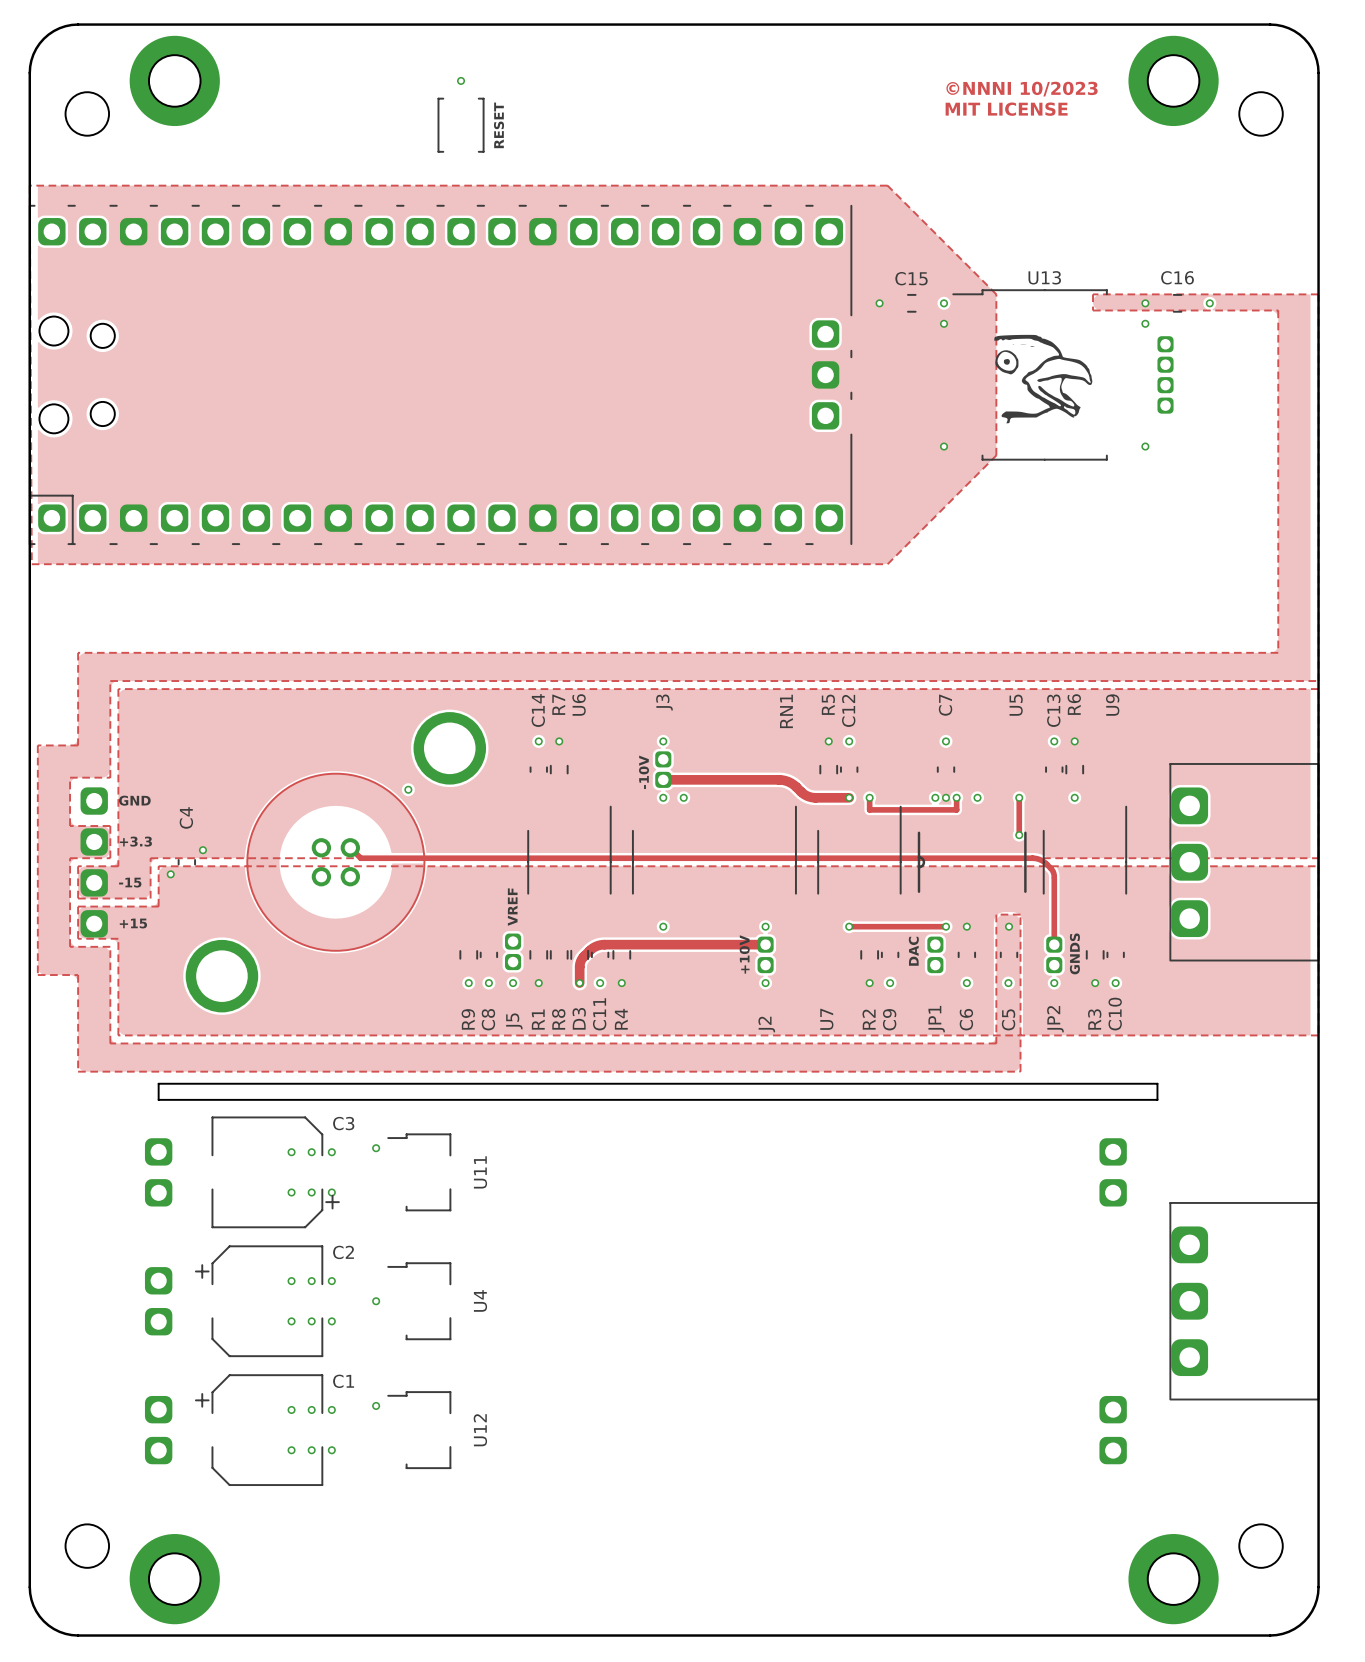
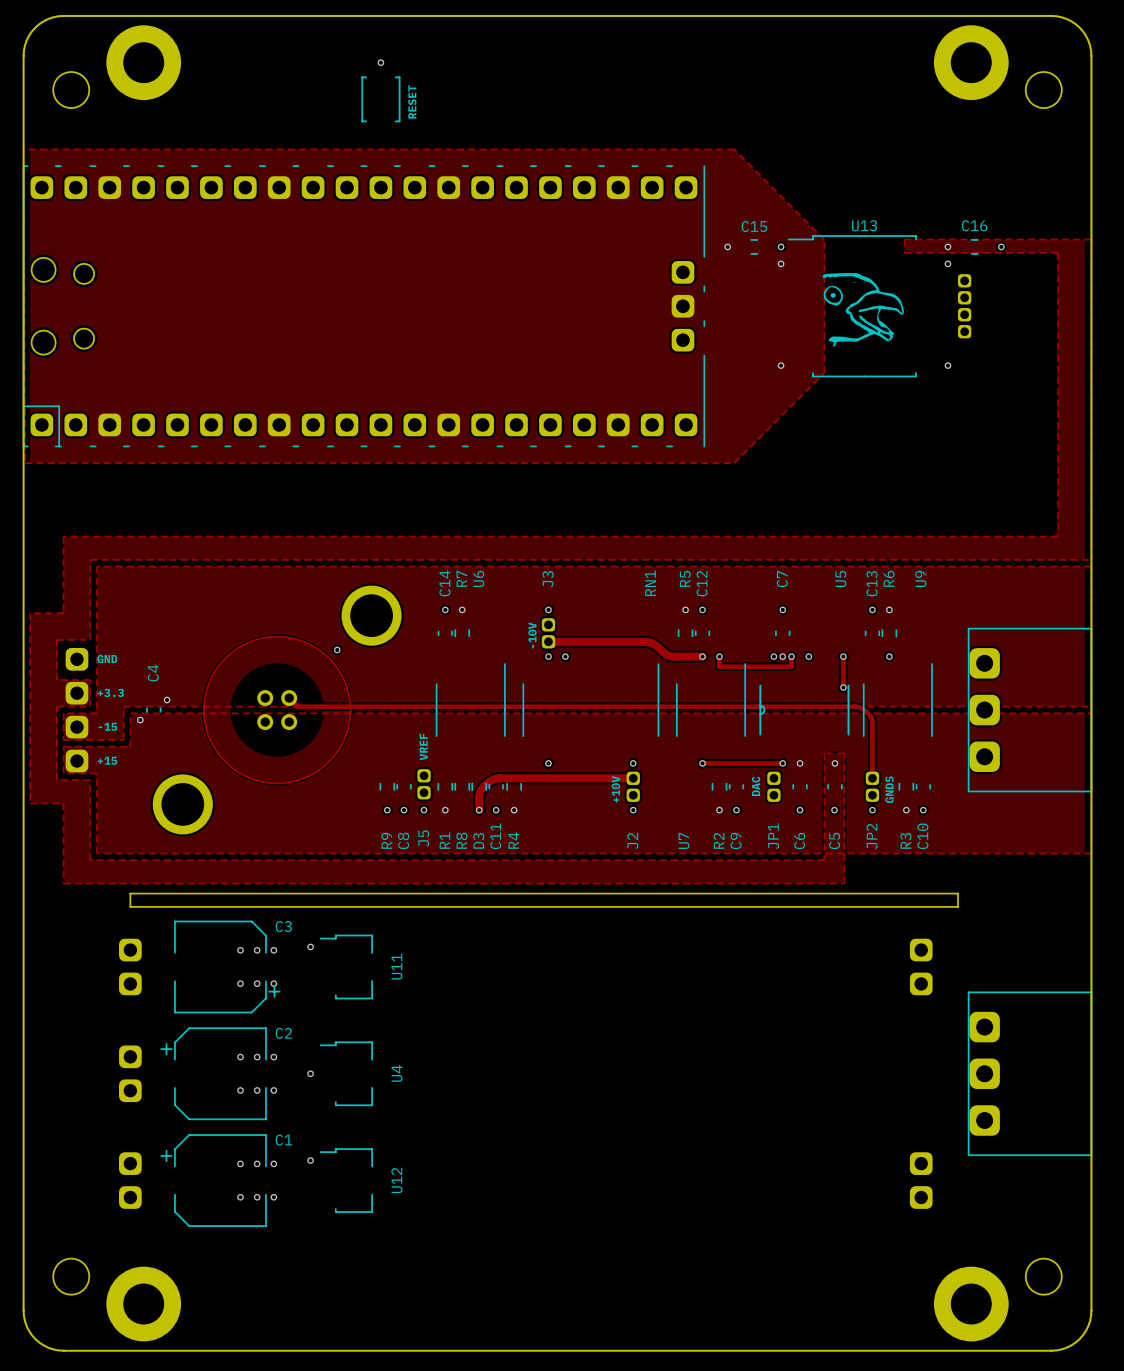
text: ©NNNI 10/2023 (1022, 89) -> none
text: MIT LICENSE (1006, 109) -> none

